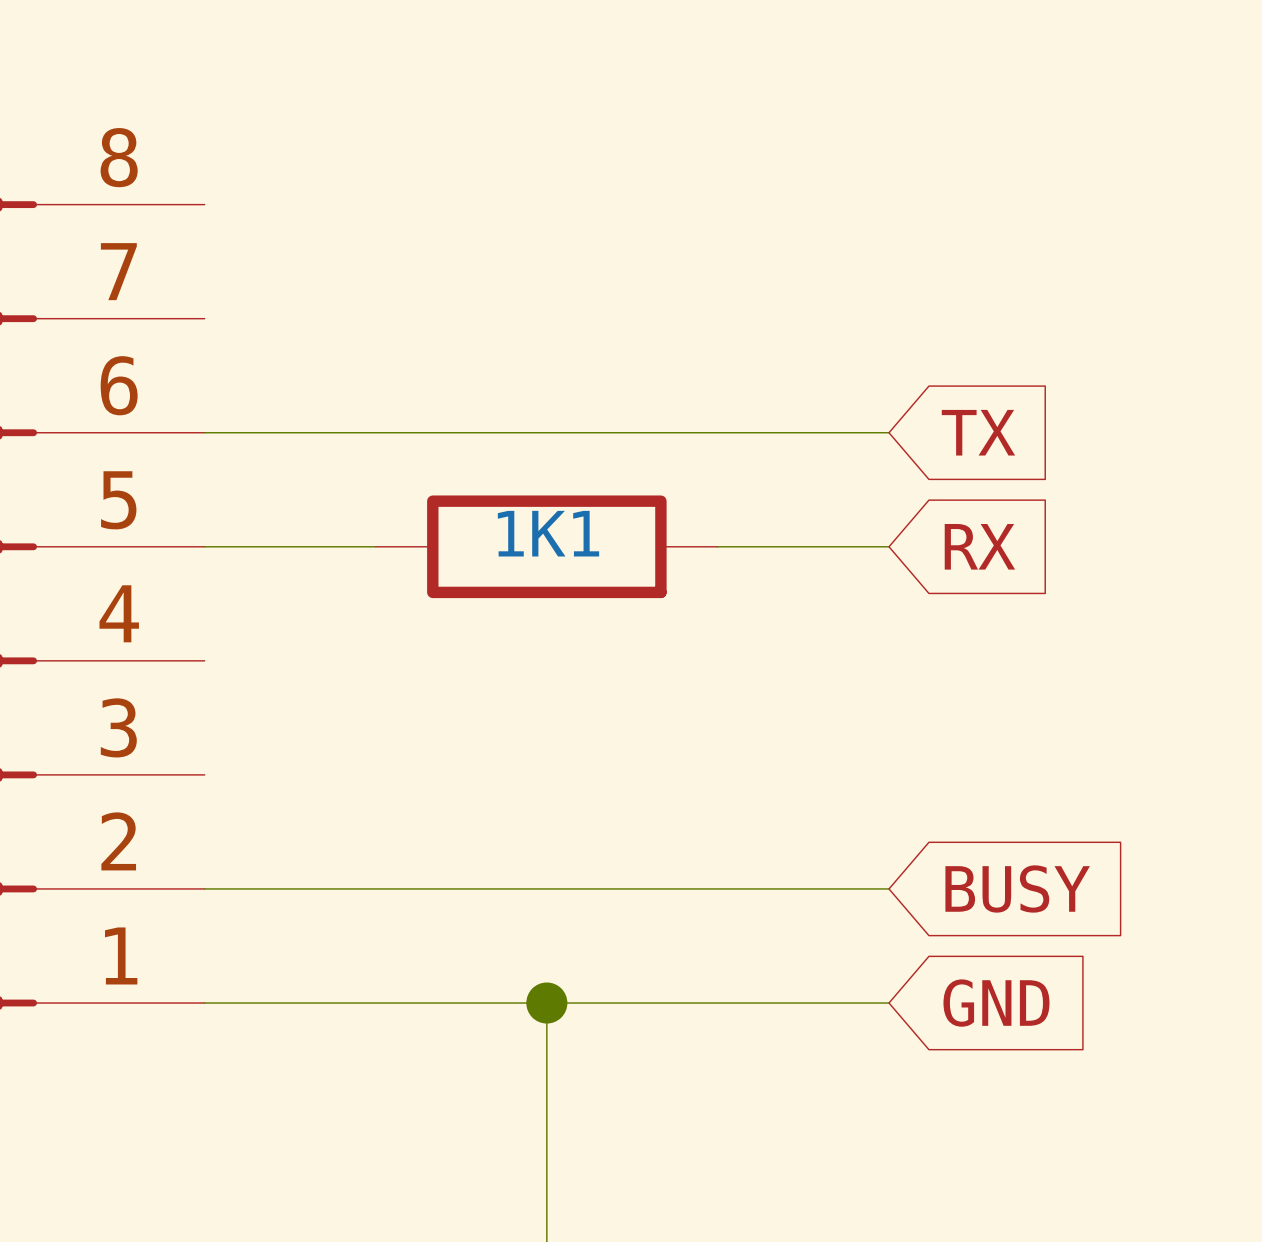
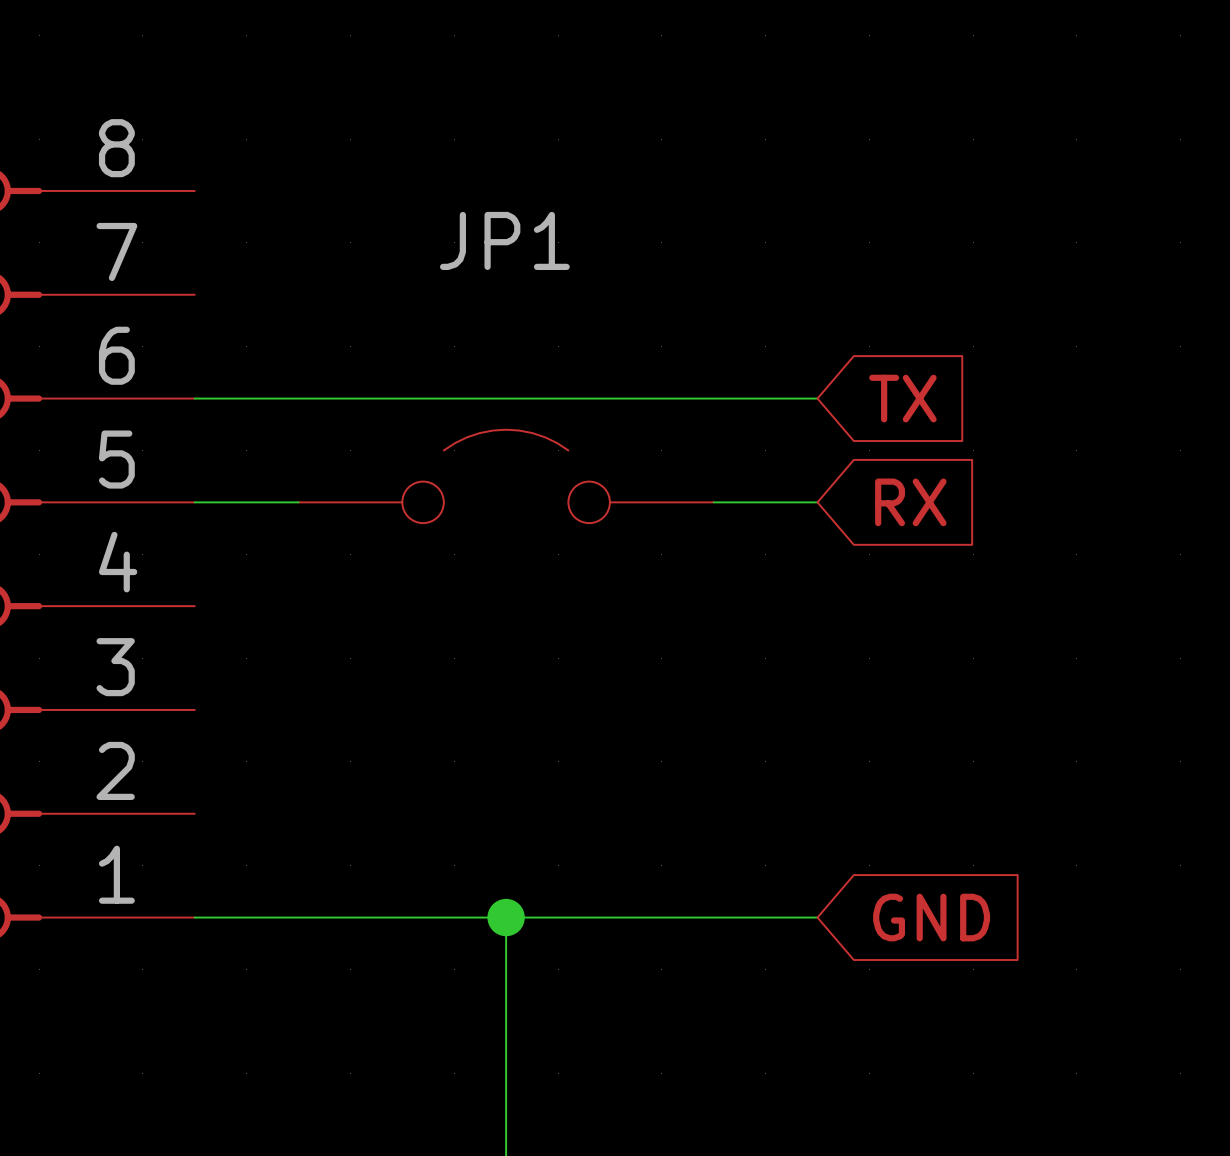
JP1: none -> (506, 476)
1K1: (546, 546) -> none
wire: (204, 888) (889, 888) -> none
global label: BUSY (1017, 888) -> none

